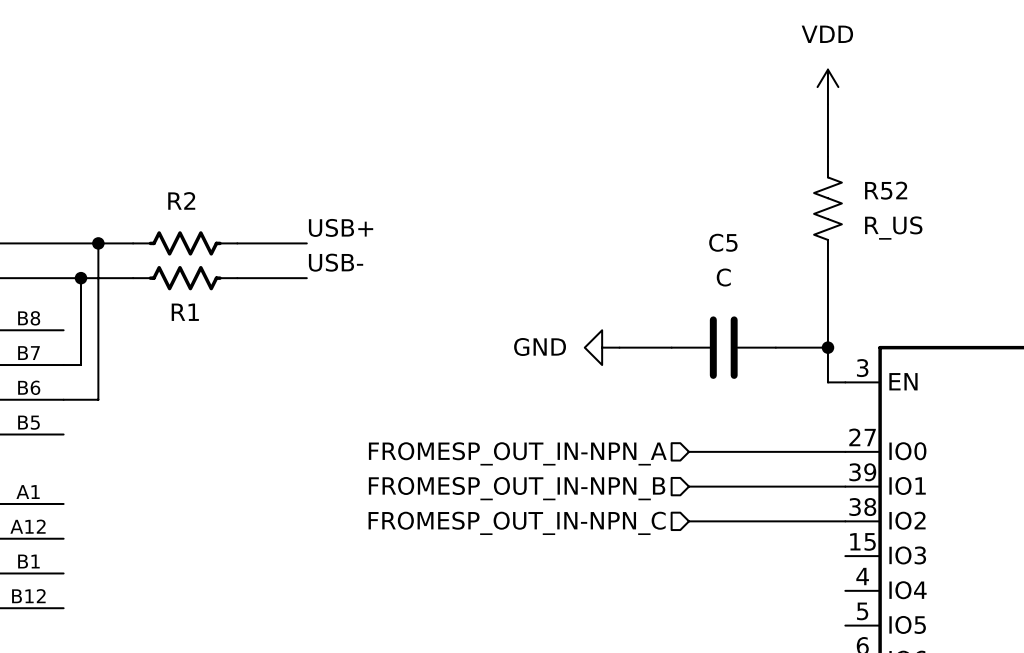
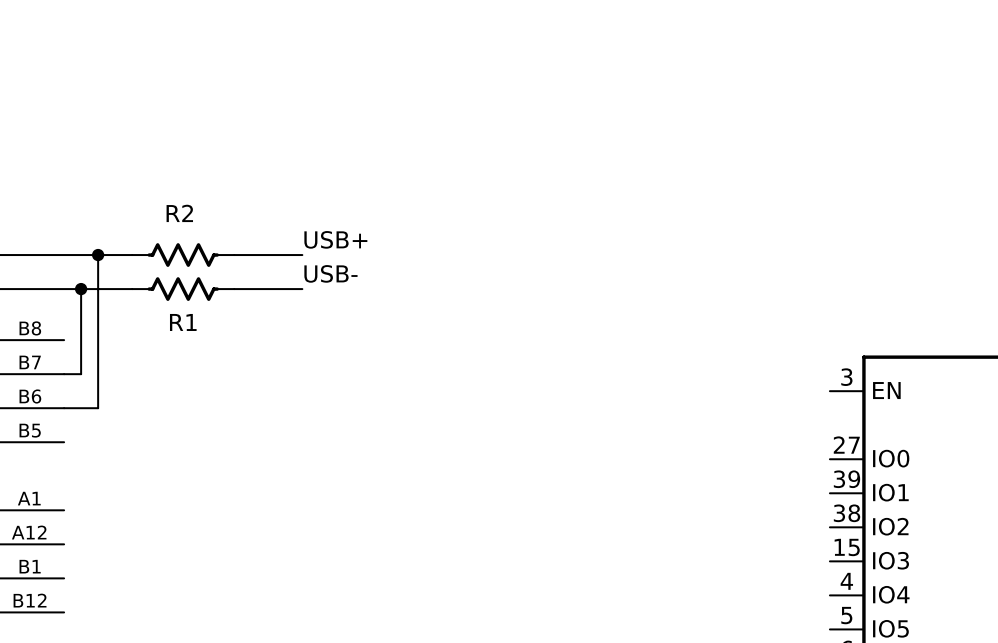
power symbol: VDD (827, 87) -> none
wire: (827, 104) (827, 156) -> none
R52: R_US (827, 208) -> none
wire: (827, 260) (827, 382) (845, 382) -> none
power symbol: GND (602, 347) -> none
wire: (619, 347) (671, 347) -> none
C5: C (723, 347) -> none
wire: (775, 347) (827, 347) -> none
junction: (827, 347) -> none
wire: (689, 451) (845, 451) -> none
hierarchical label: FROMESP_OUT_IN-NPN_A (517, 453) -> none
wire: (689, 486) (845, 486) -> none
hierarchical label: FROMESP_OUT_IN-NPN_B (517, 488) -> none
wire: (689, 521) (845, 521) -> none
hierarchical label: FROMESP_OUT_IN-NPN_C (517, 523) -> none

